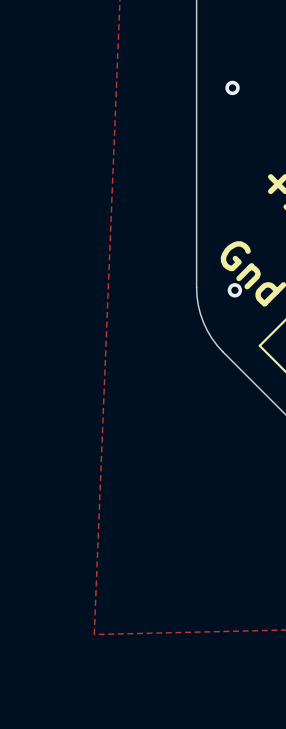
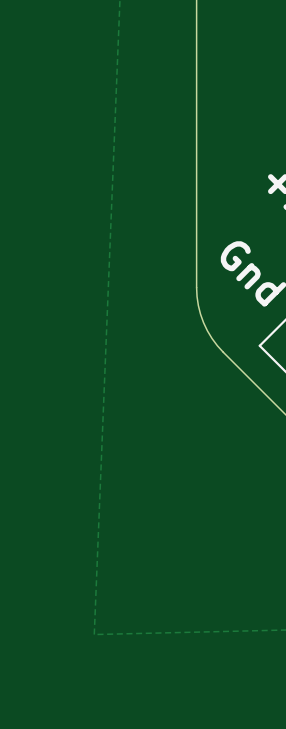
via: (232, 87) -> none
via: (234, 290) -> none

